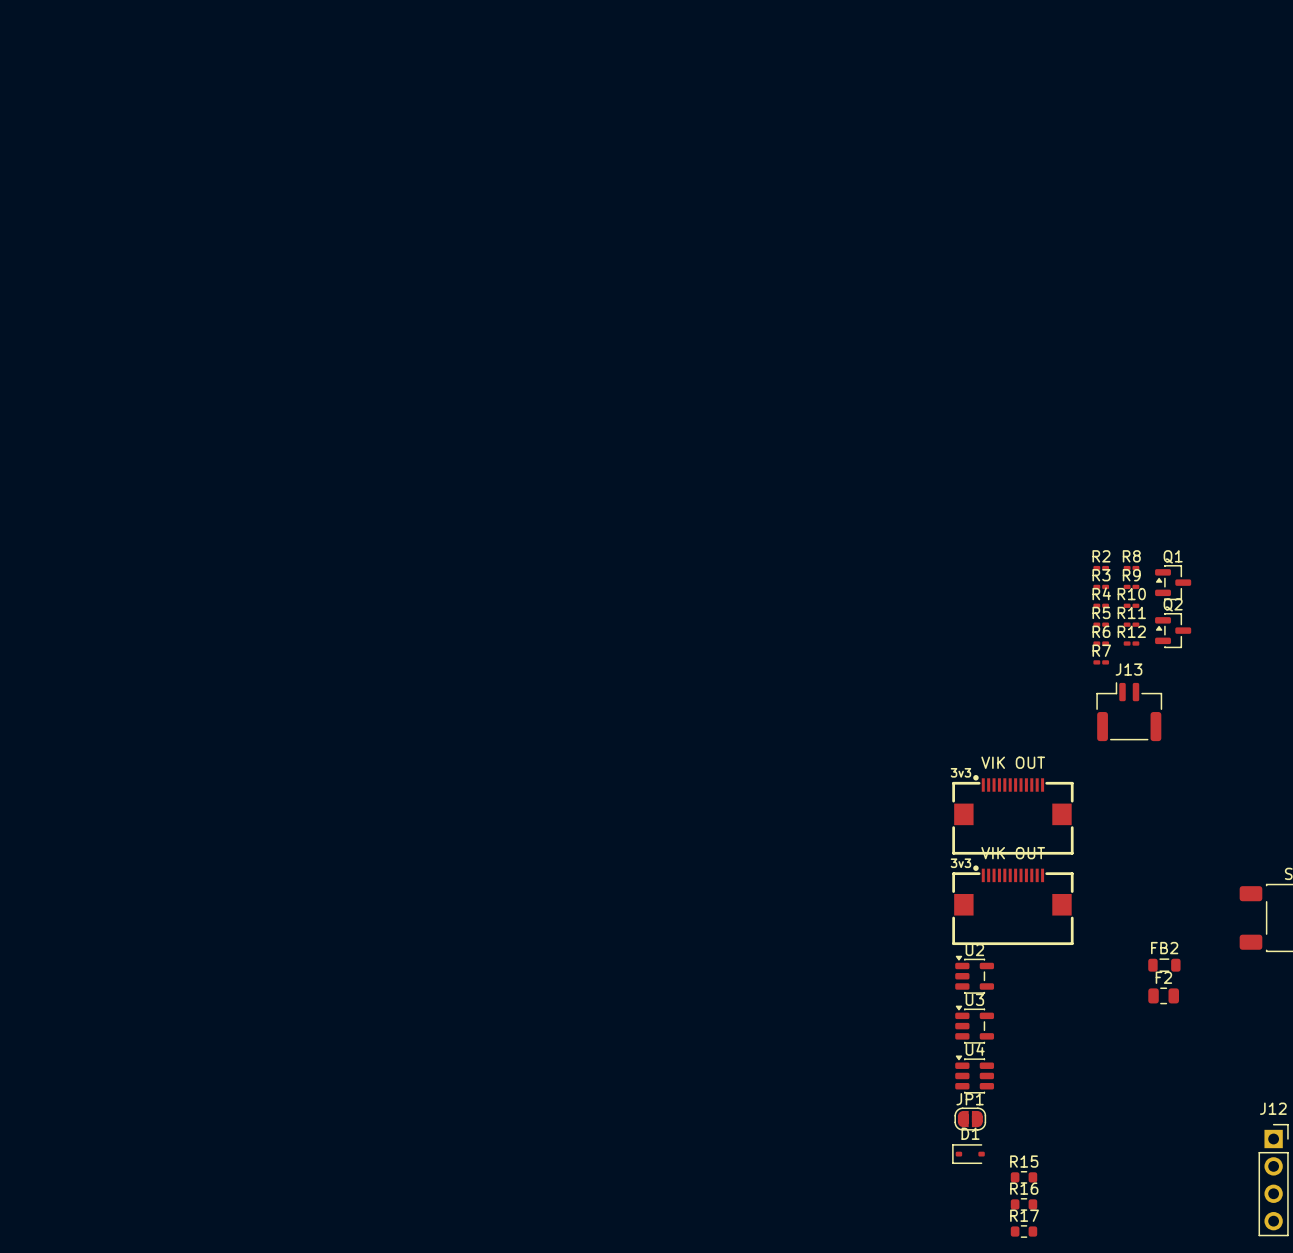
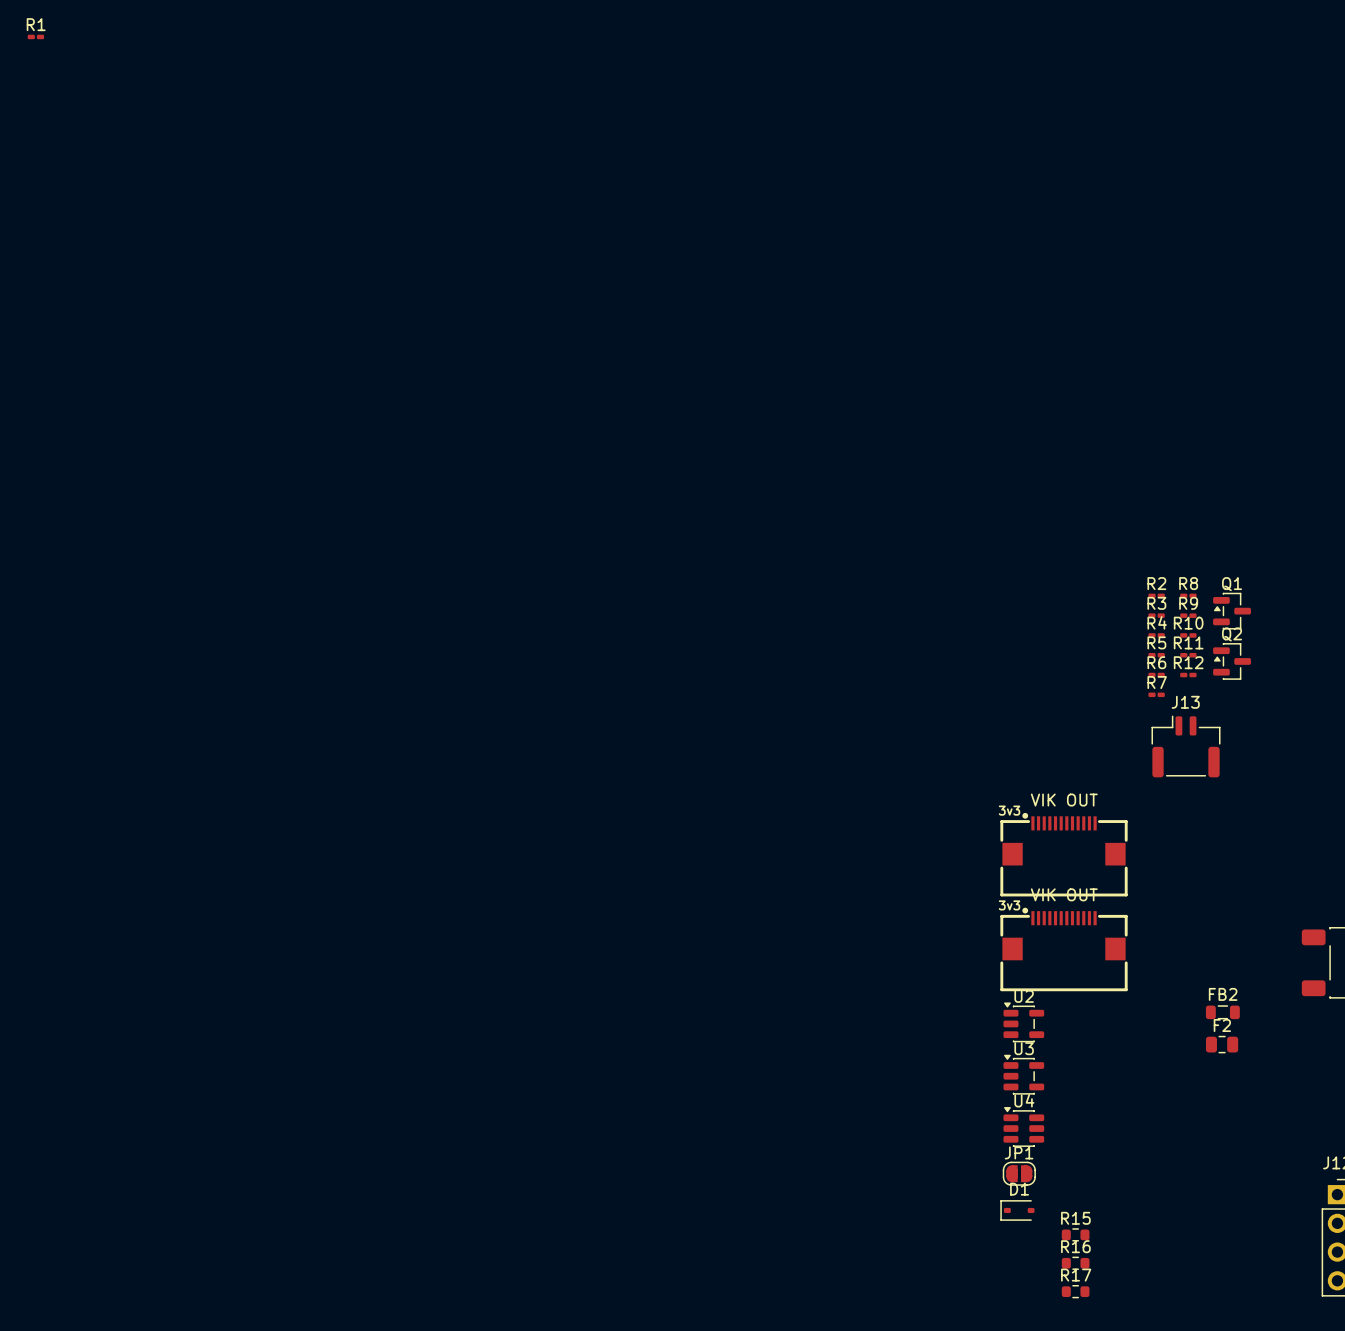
R1: none -> (35, 36)

